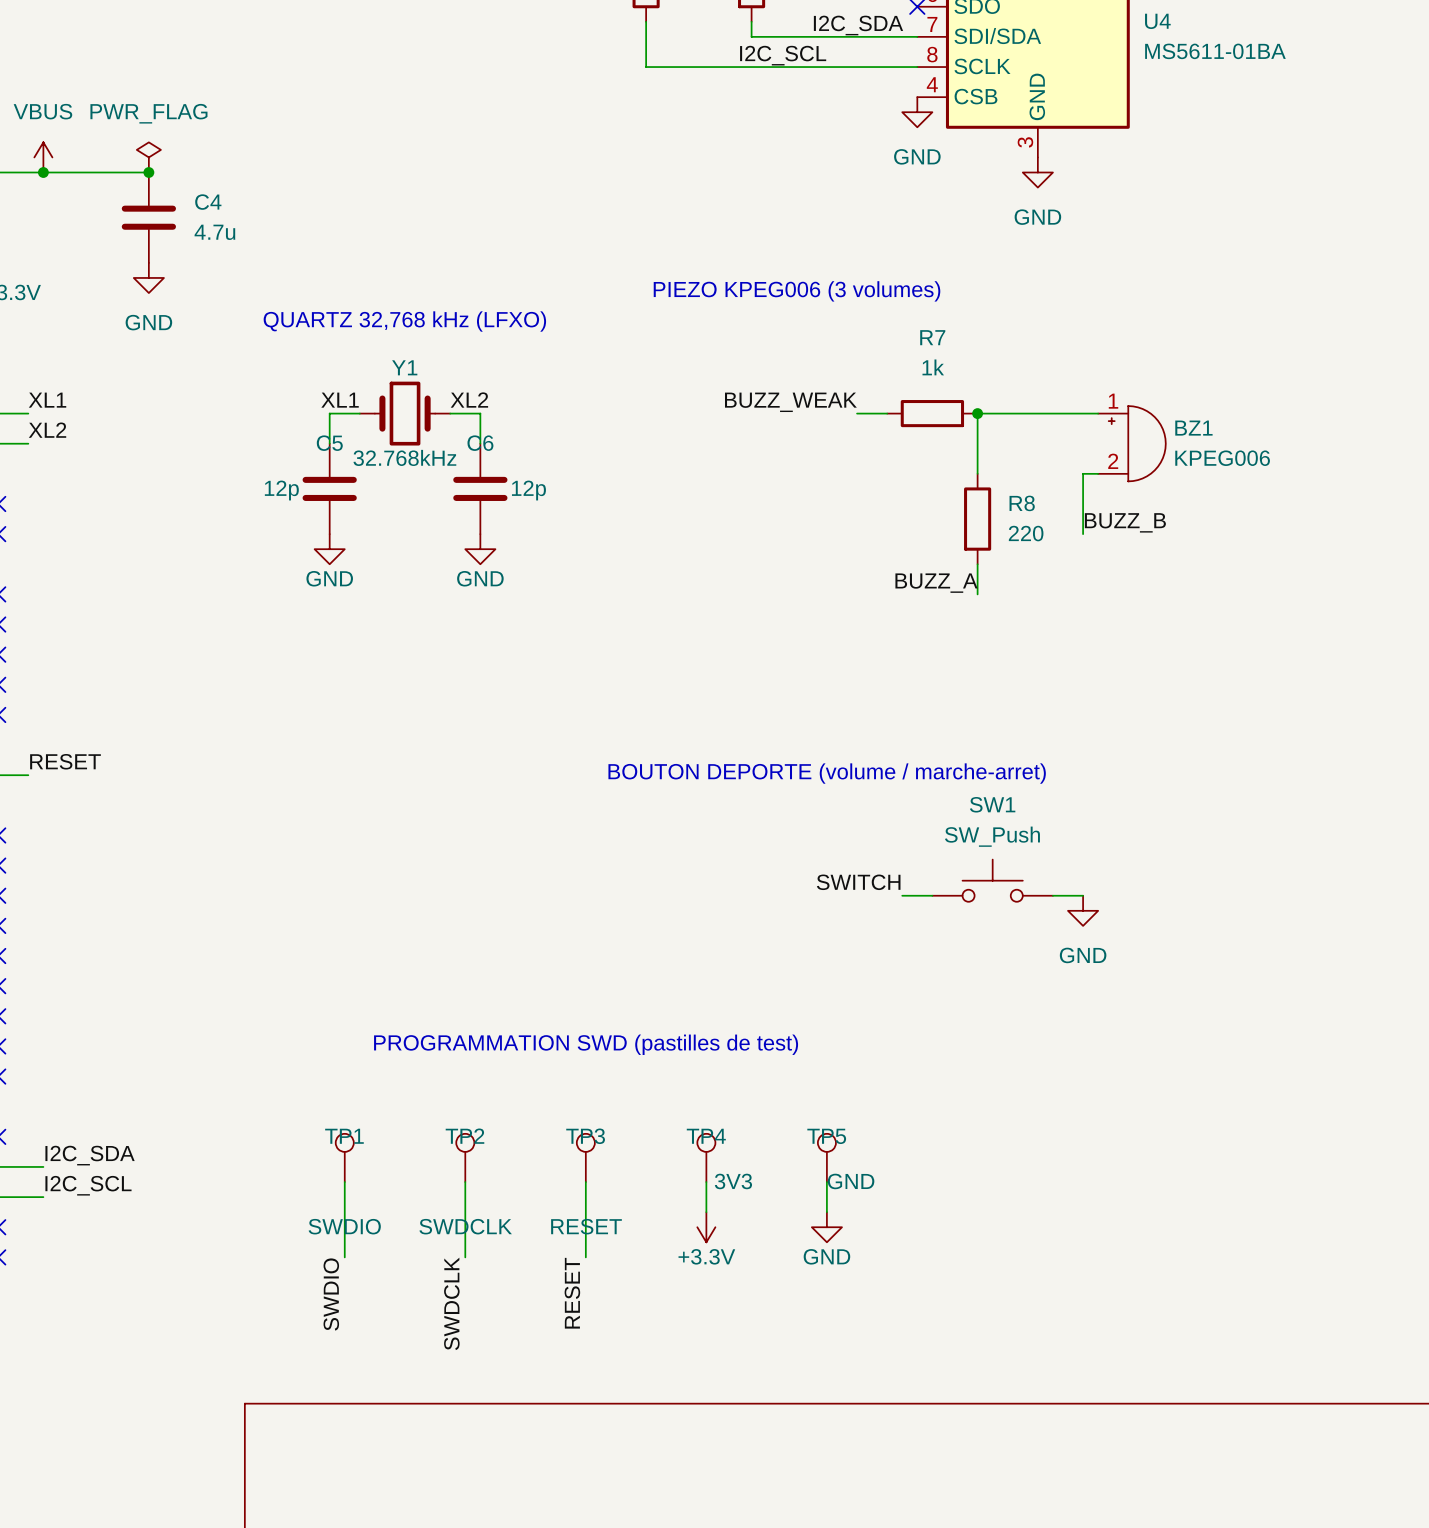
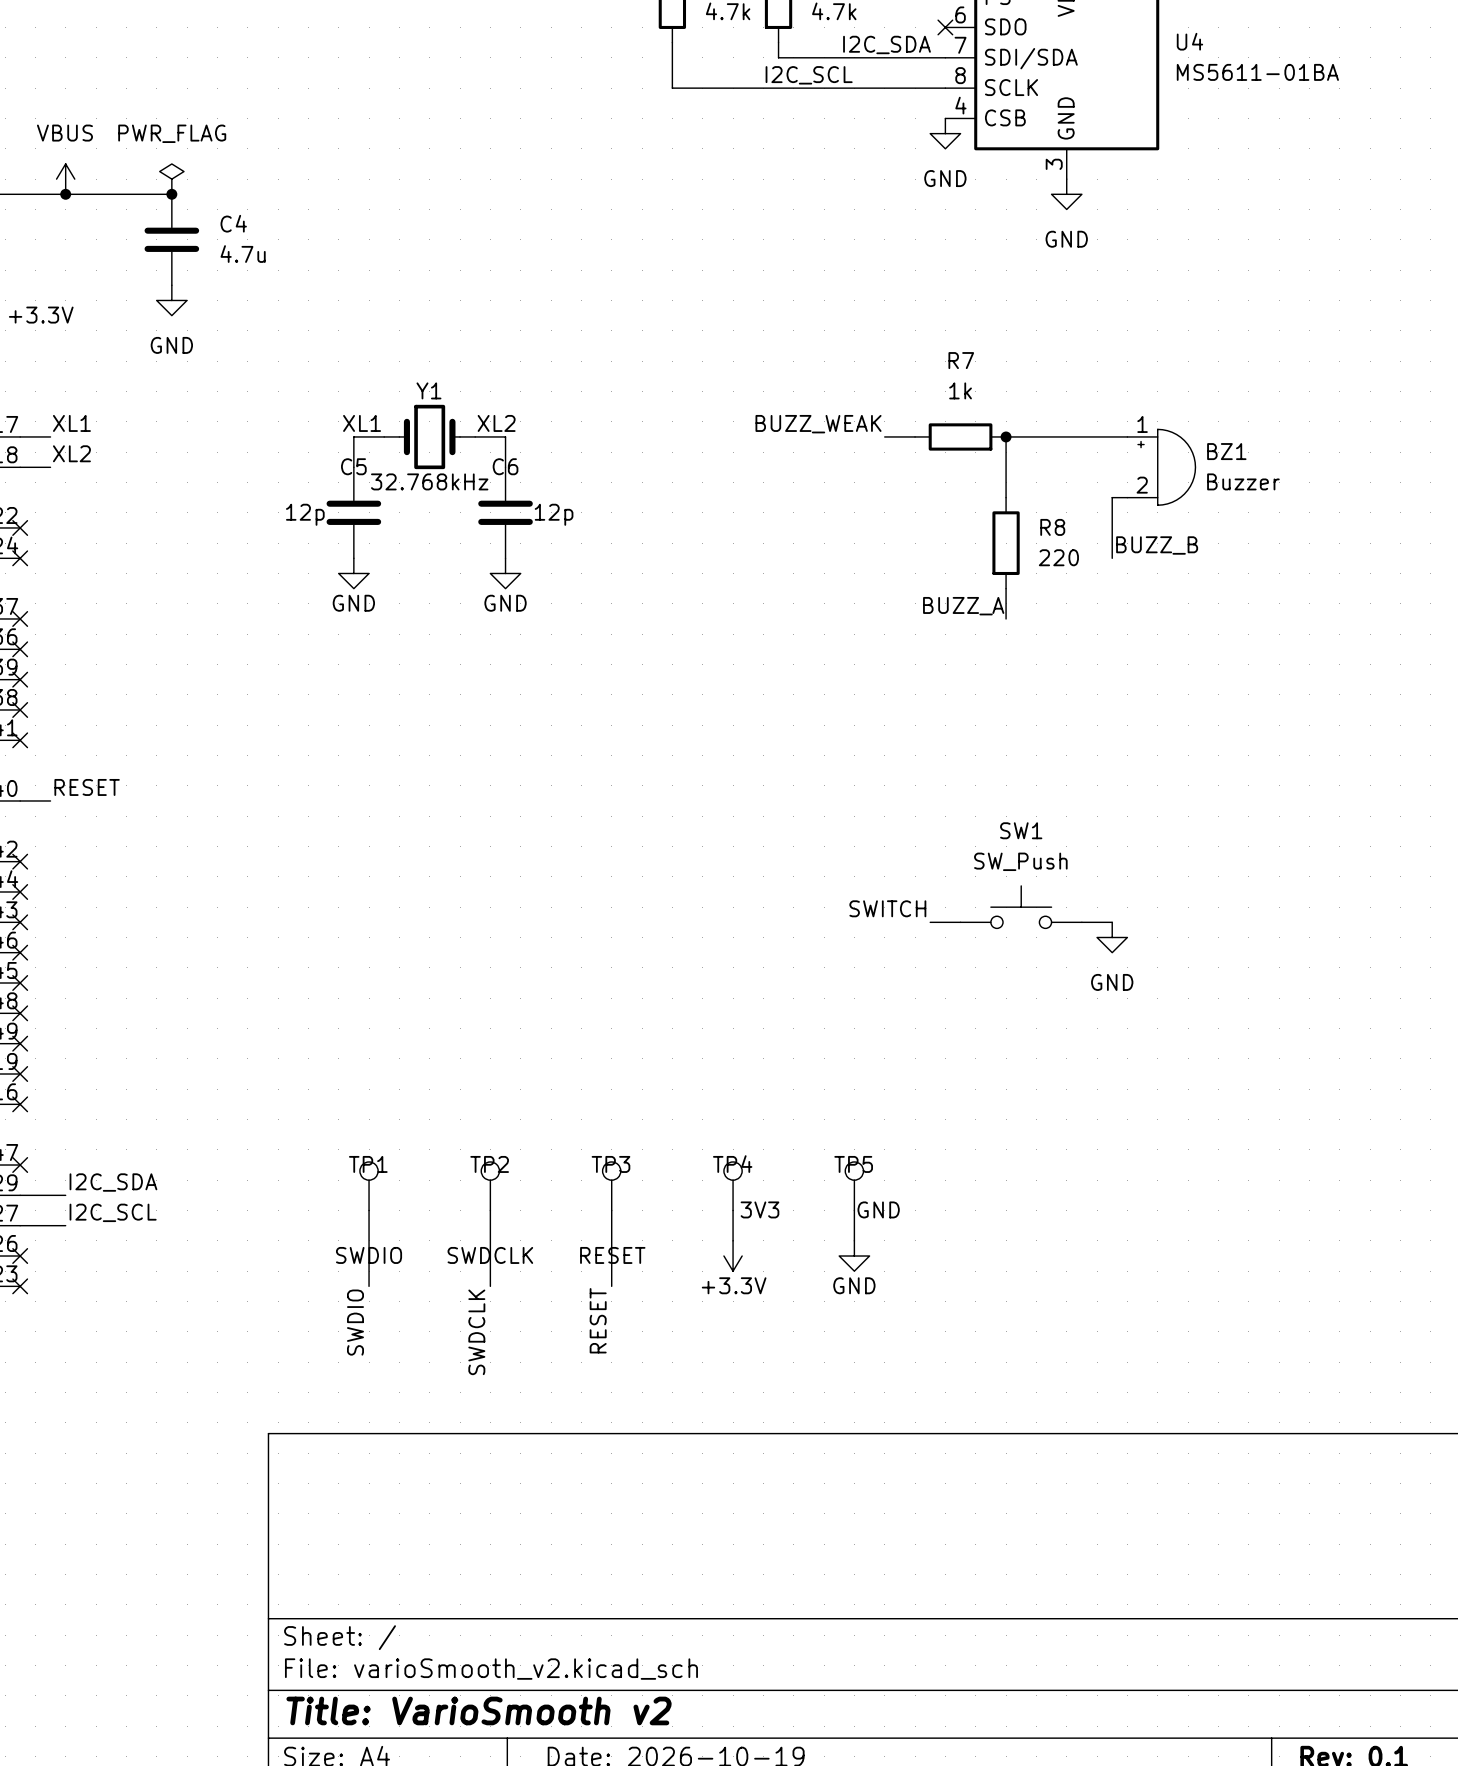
text: PIEZO KPEG006 (3 volumes) (797, 291) -> none
text: QUARTZ 32,768 kHz (LFXO) (404, 321) -> none
BZ1 value: KPEG006 (1222, 458) -> Buzzer (1243, 481)
text: BOUTON DEPORTE (volume / marche-arret) (827, 773) -> none
text: PROGRAMMATION SWD (pastilles de test) (586, 1044) -> none

